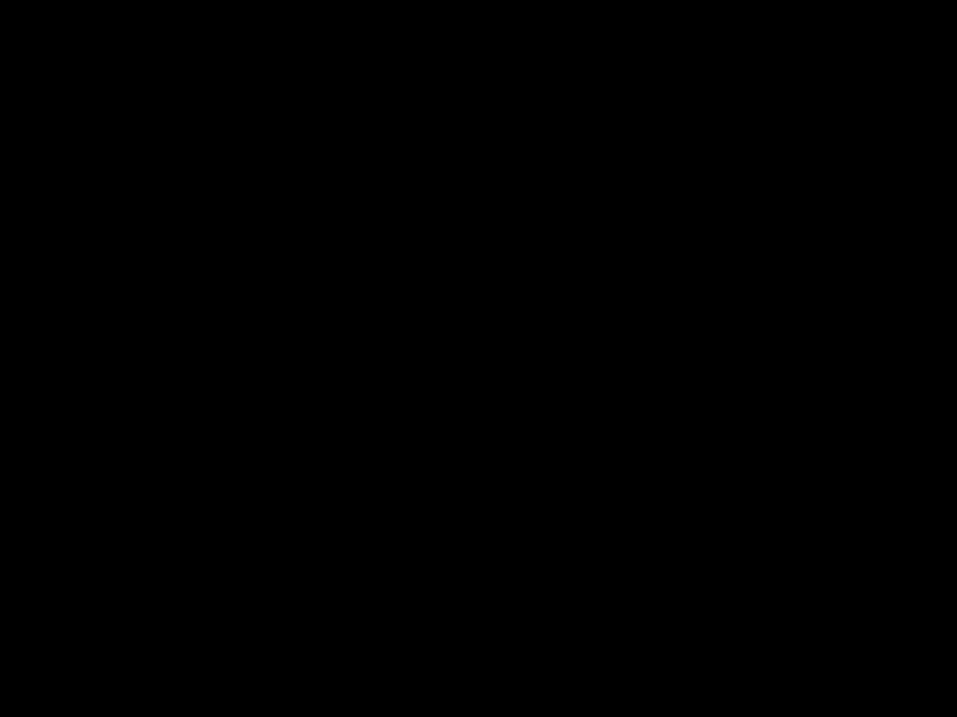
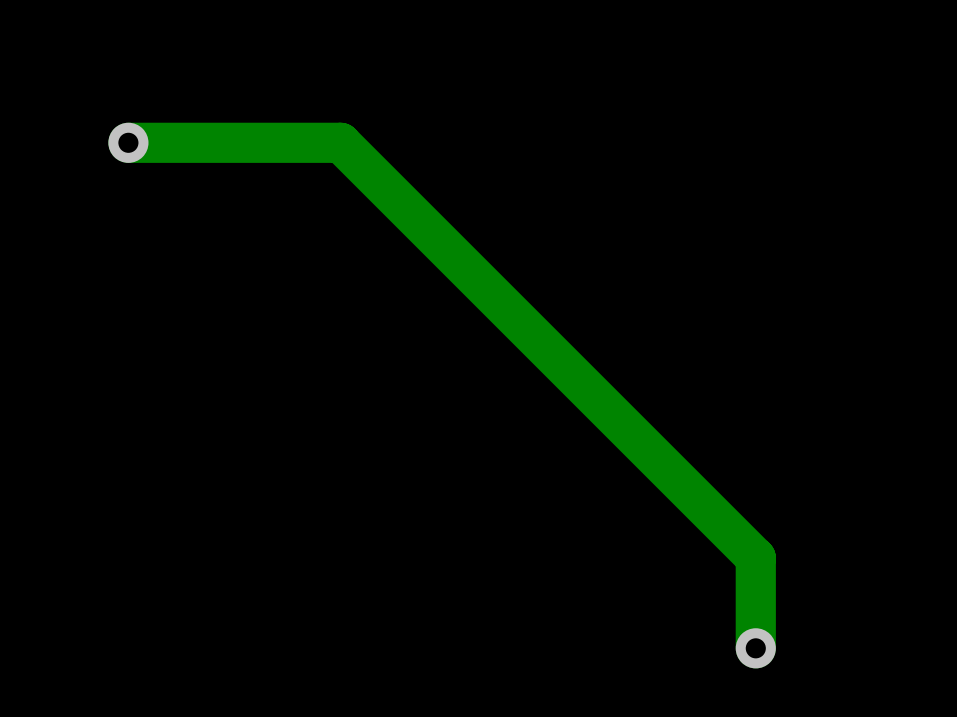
track: none -> (128, 142) (340, 142) (755, 557) (755, 648)
via: none -> (128, 142)
via: none -> (755, 648)

